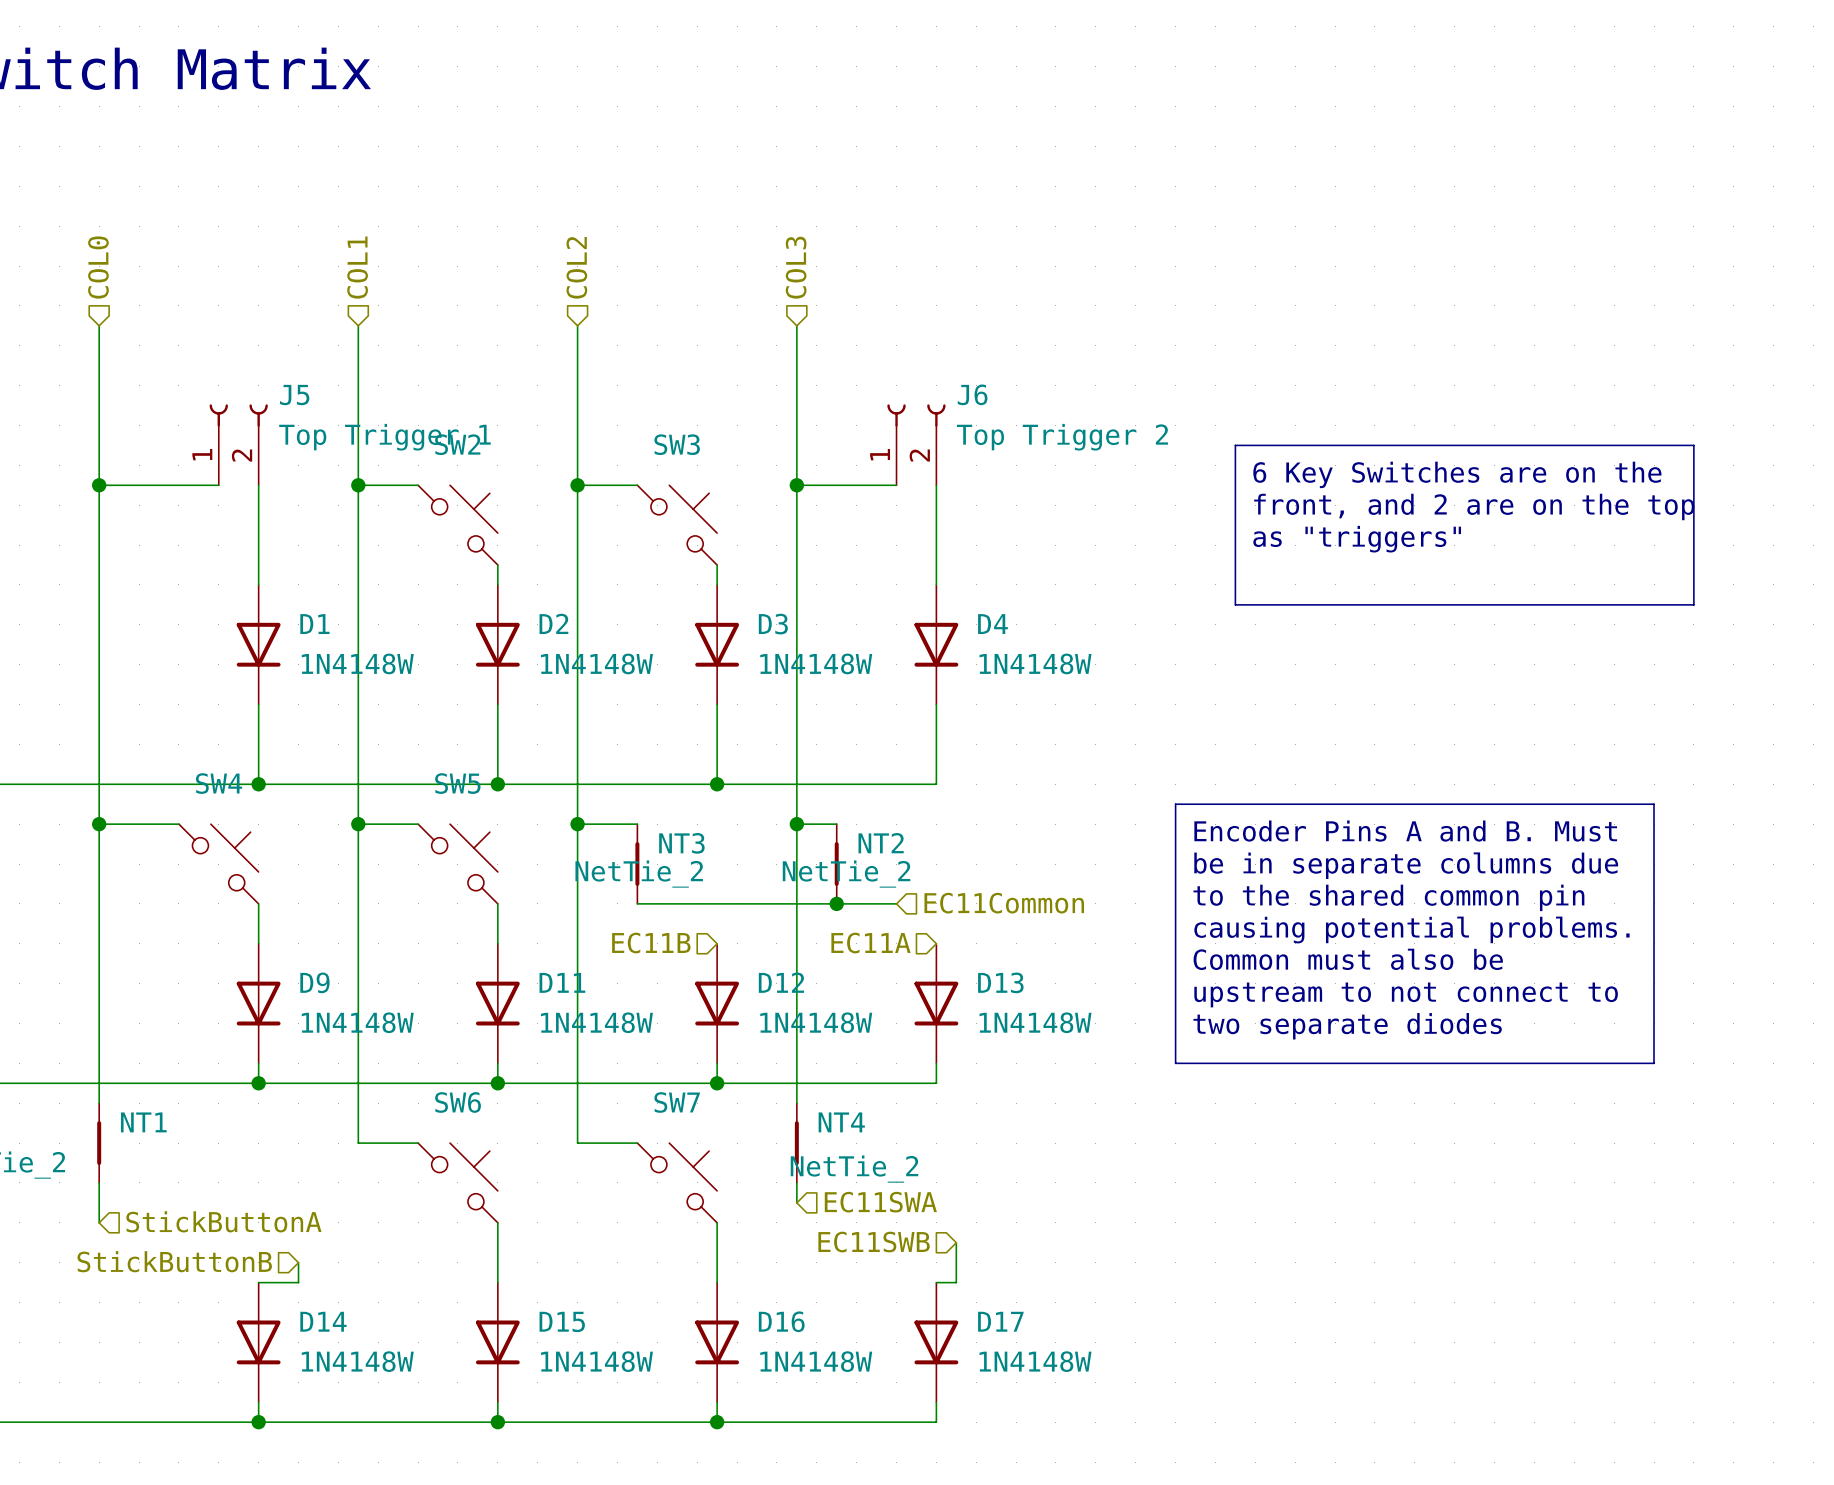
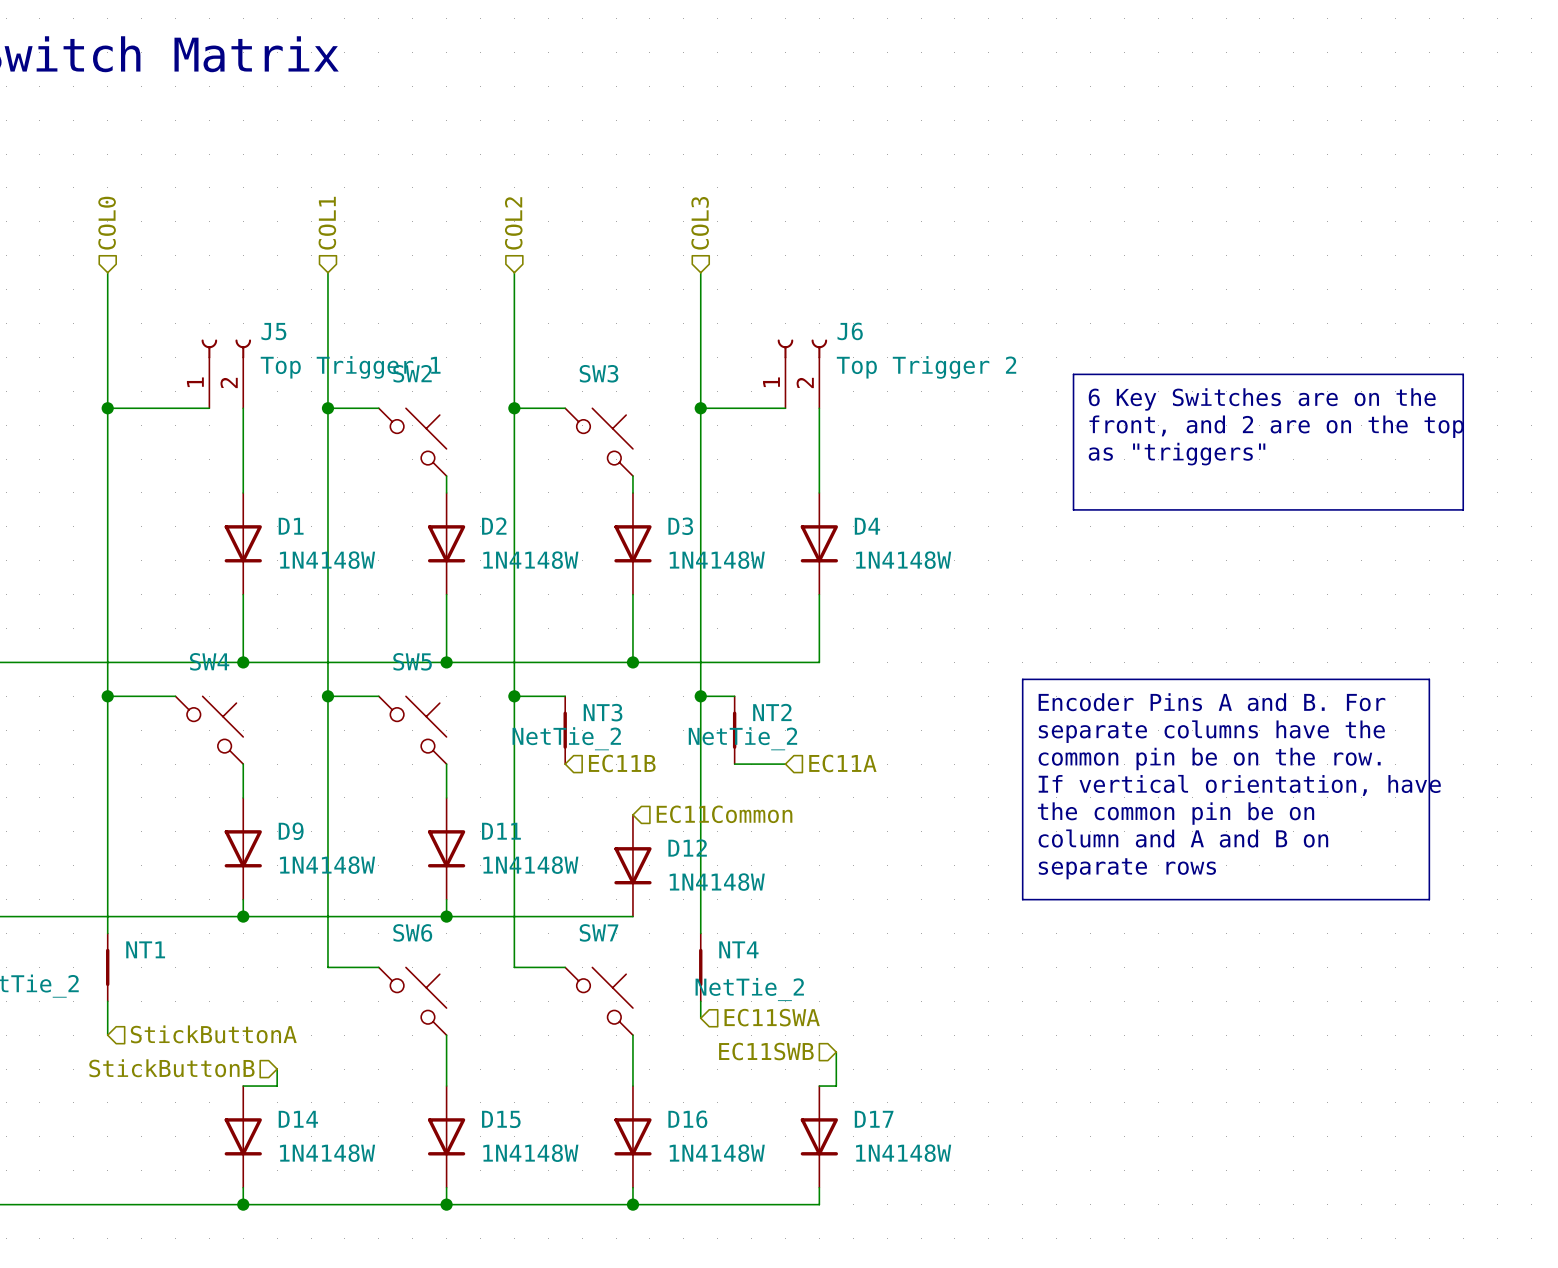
text: Encoder Pins A and B. Must (1405, 831) -> Encoder Pins A and B. For (1211, 702)
text: be in separate columns due (1406, 865) -> separate columns have the (1211, 731)
text: to the shared common pin (1388, 897) -> common pin be on the row. (1209, 758)
wire: (637, 903) (836, 903) -> none
junction: (836, 903) -> none
hierarchical label: EC11Common (1004, 903) -> EC11A (842, 763)
text: causing potential problems. (1411, 930) -> If vertical orientation, have (1239, 785)
hierarchical label rotation: 0° (651, 943) -> 180° (622, 763)
hierarchical label: EC11A (870, 943) -> none
text: Common must also be (1348, 959) -> the common pin be on (1176, 813)
hierarchical label: none -> EC11Common (724, 814)
text: upstream to not connect to (1406, 994) -> column and A and B on (1183, 838)
D12 position: (717, 1003) -> (632, 865)
D13: 1N4148W (936, 1003) -> none
text: two separate diodes (1347, 1026) -> separate rows (1127, 868)
wire: (717, 1063) (717, 1083) (936, 1083) (936, 1063) -> none
junction: (717, 1083) -> none

